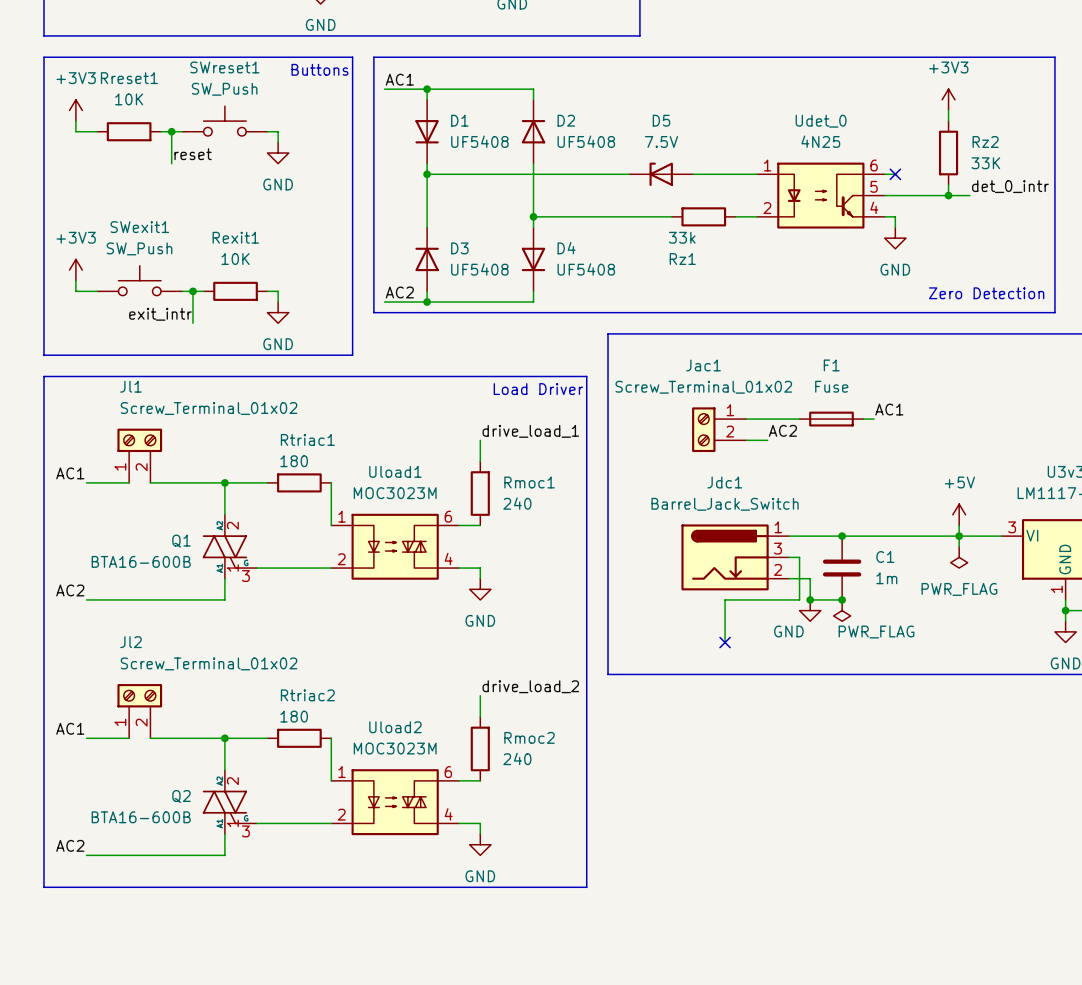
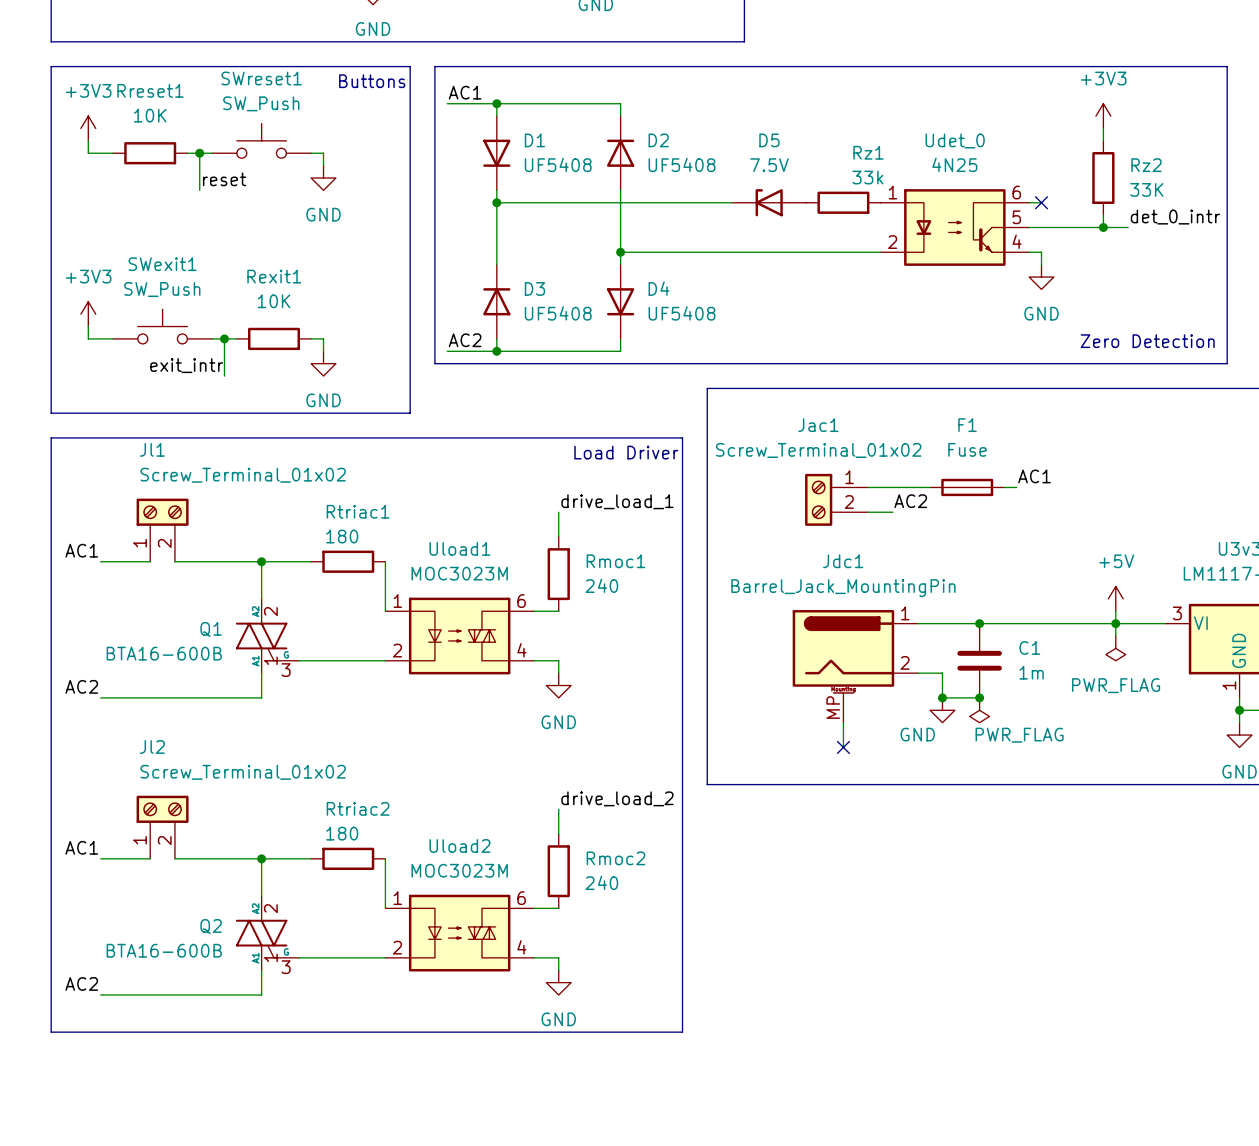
wire: (693, 174) (756, 174) -> (781, 252) (855, 252)
Rz1 position: (703, 216) -> (843, 202)
Rz1 value position: 33k (682, 237) -> 33k (867, 177)
Rz1 name position: Rz1 (682, 259) -> Rz1 (868, 152)
Jdc1 value: Barrel_Jack_Switch (725, 504) -> Barrel_Jack_MountingPin (843, 588)
Jdc1 symbol: [681, 524, 789, 591] -> [792, 610, 918, 723]
wire: (788, 557) (799, 557) (799, 599) (725, 599) (725, 621) -> none

